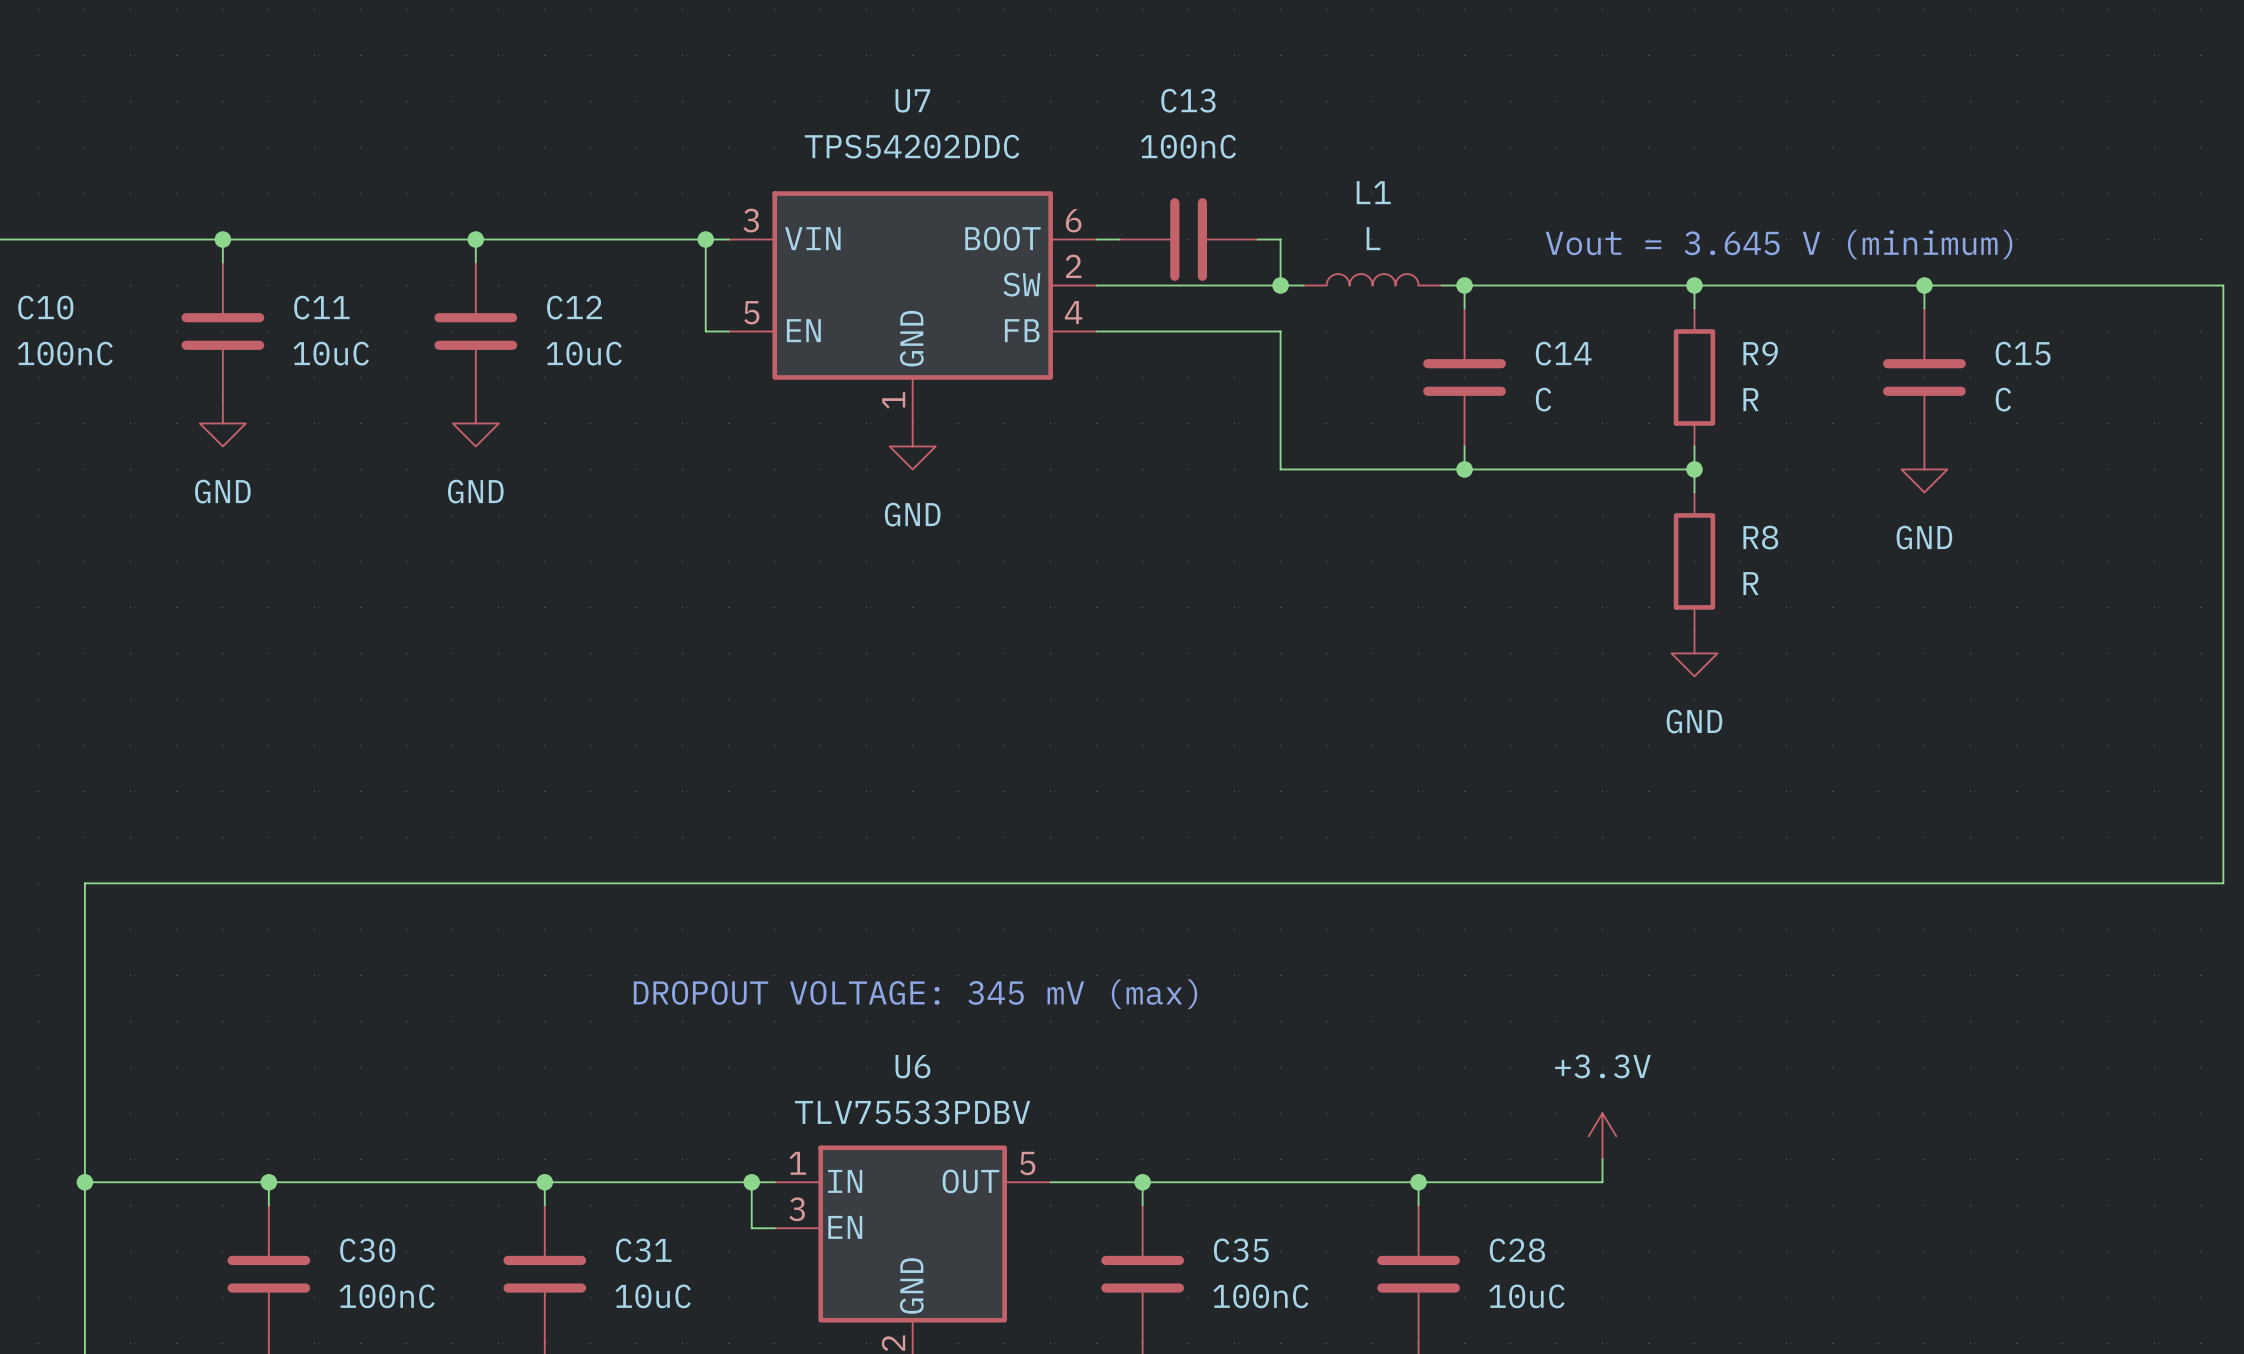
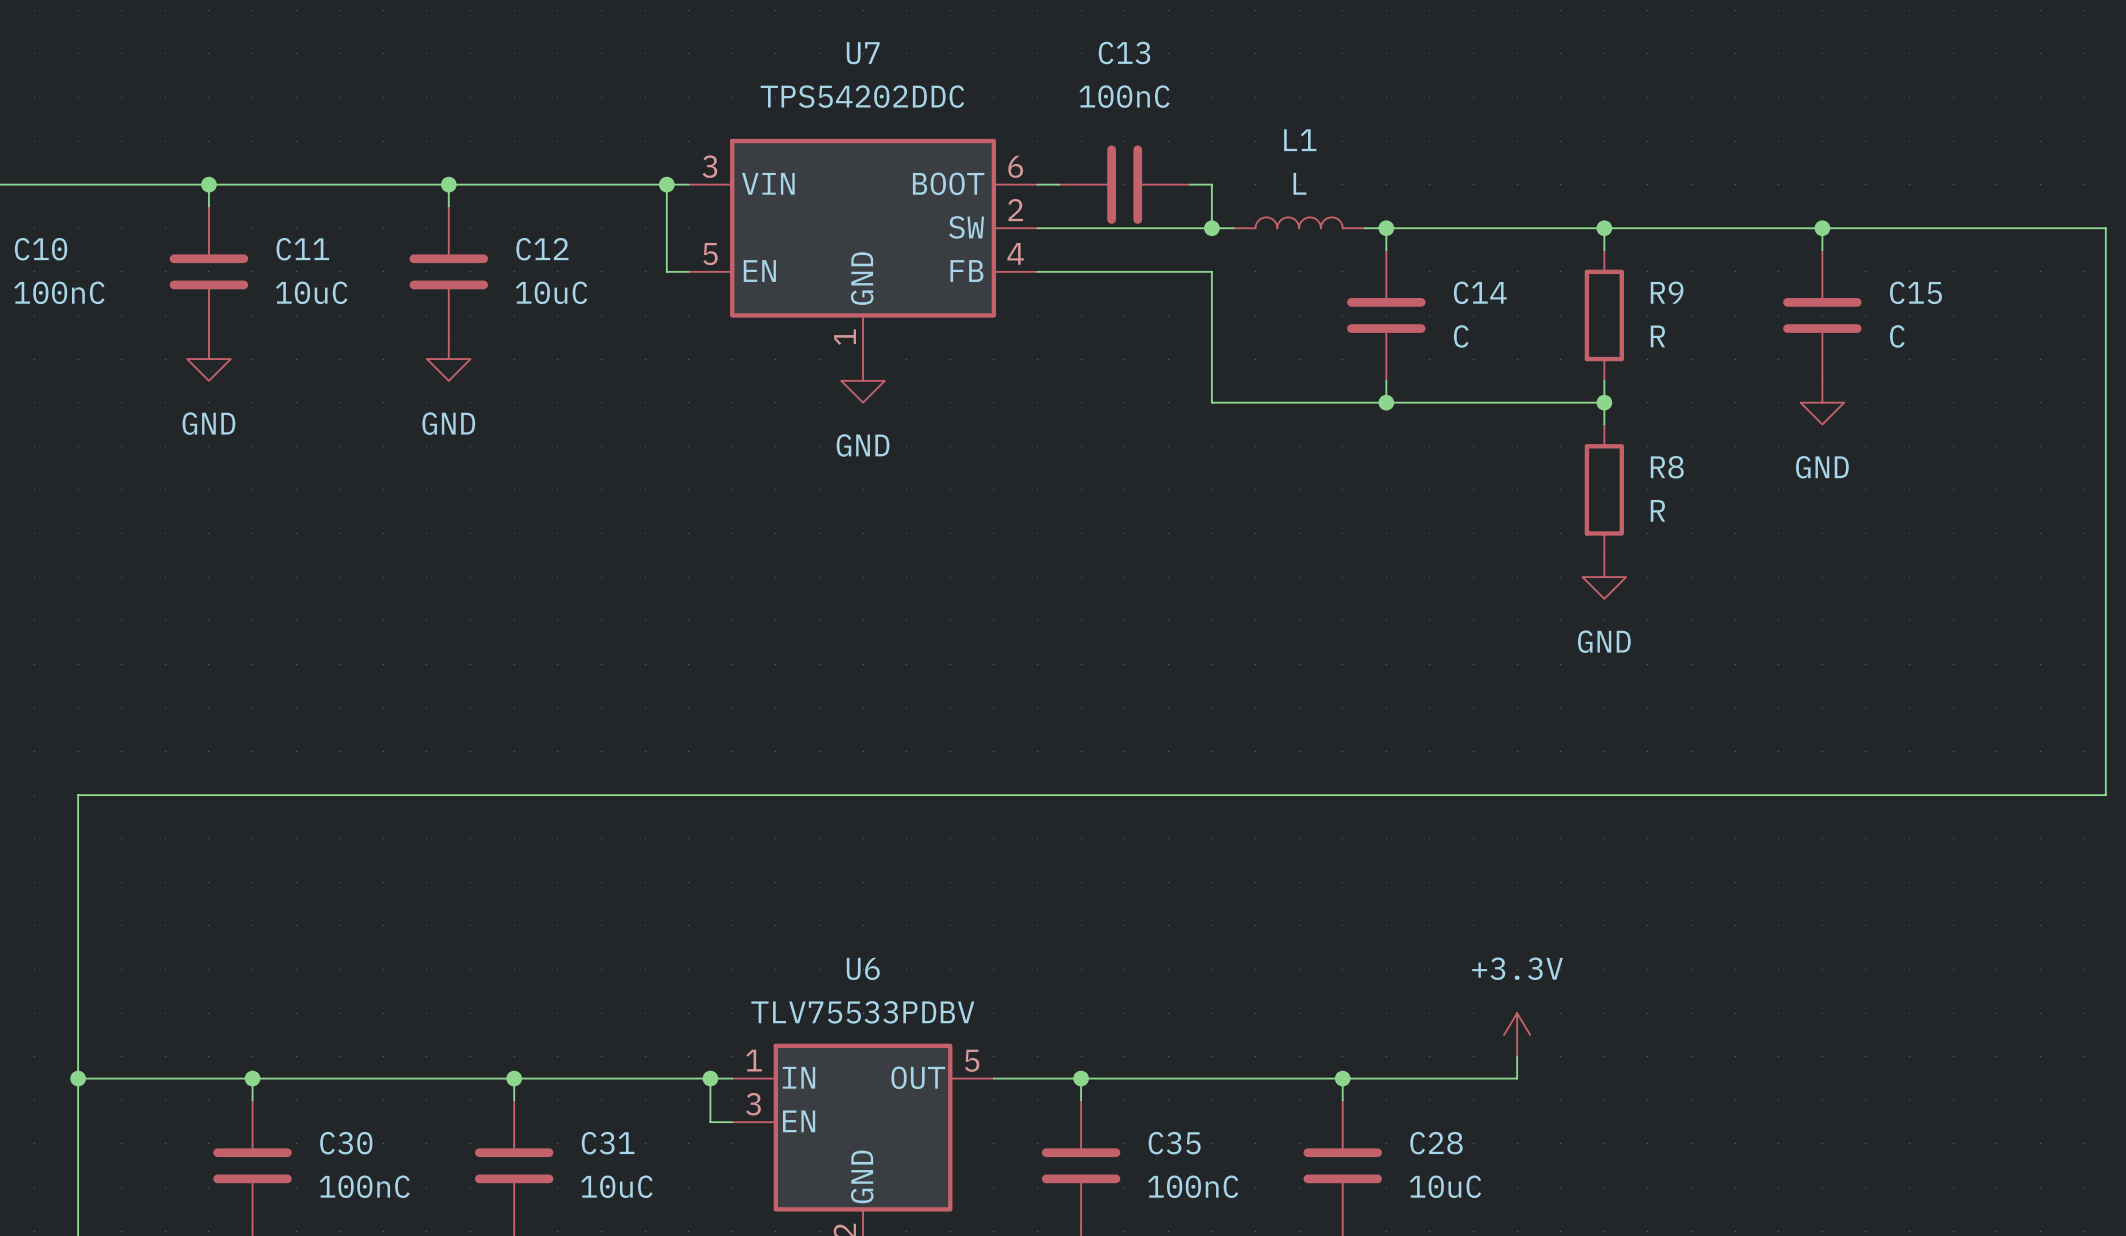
text: Vout = 3.645 V (minimum) (1779, 244) -> none
text: DROPOUT VOLTAGE: 345 mV (max) (915, 994) -> none

